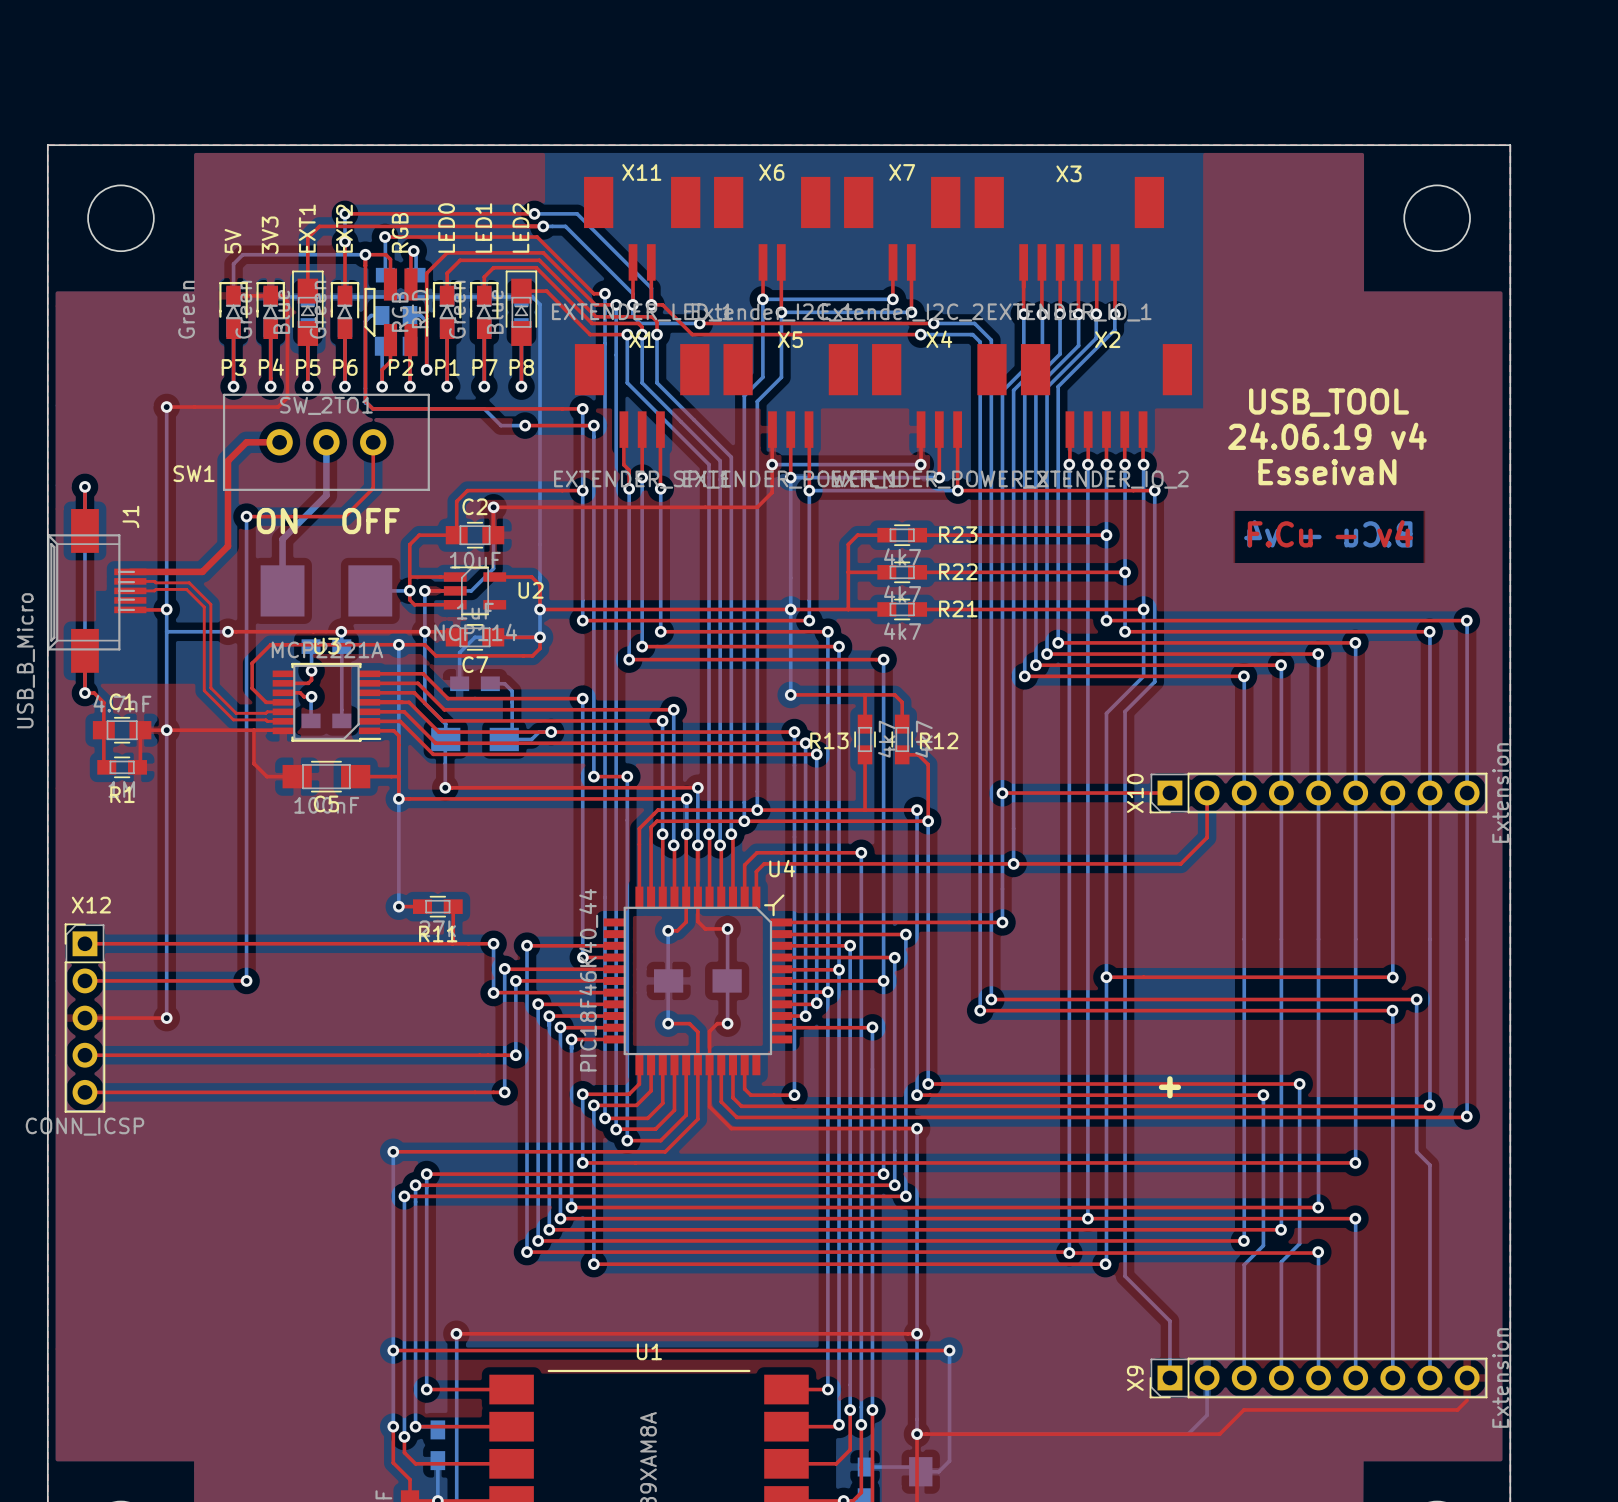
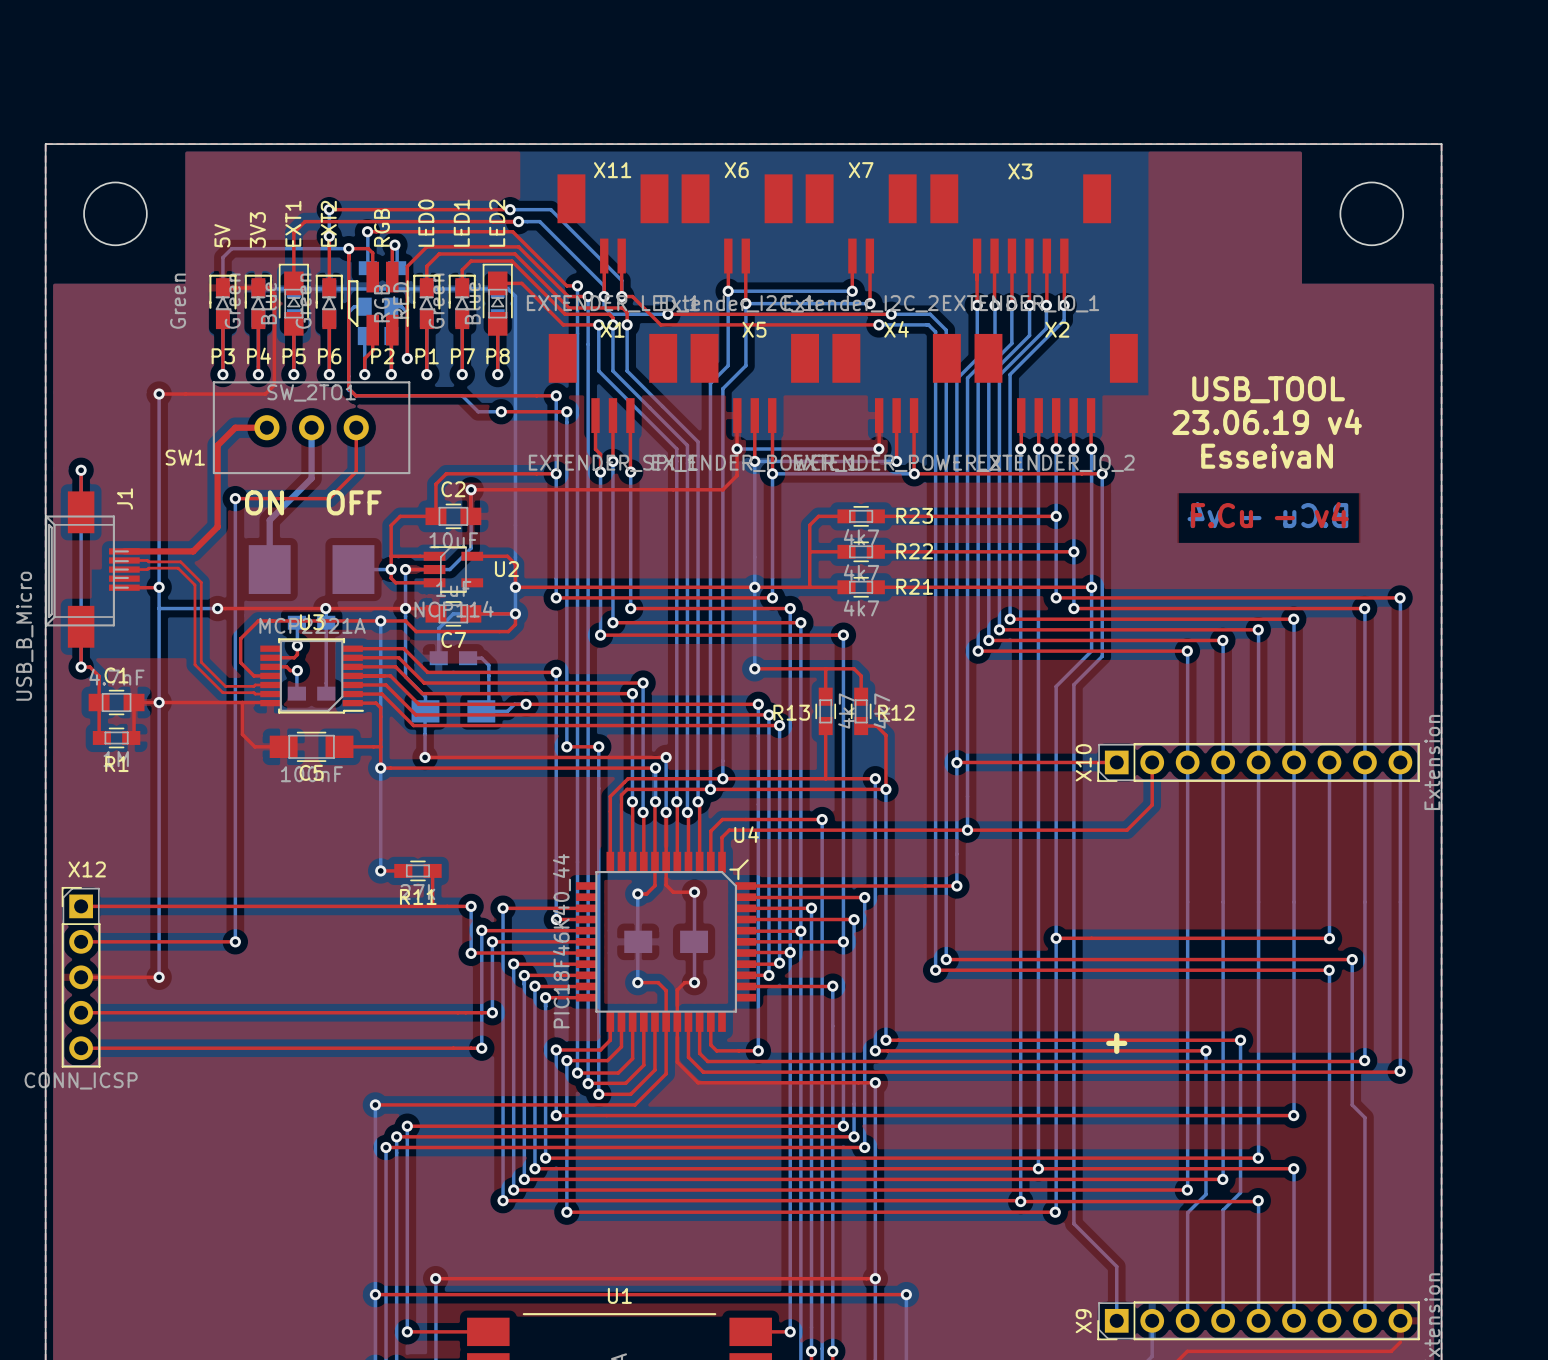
text: 24.06.19 v4 (1327, 436) -> 23.06.19 v4 (1267, 421)

